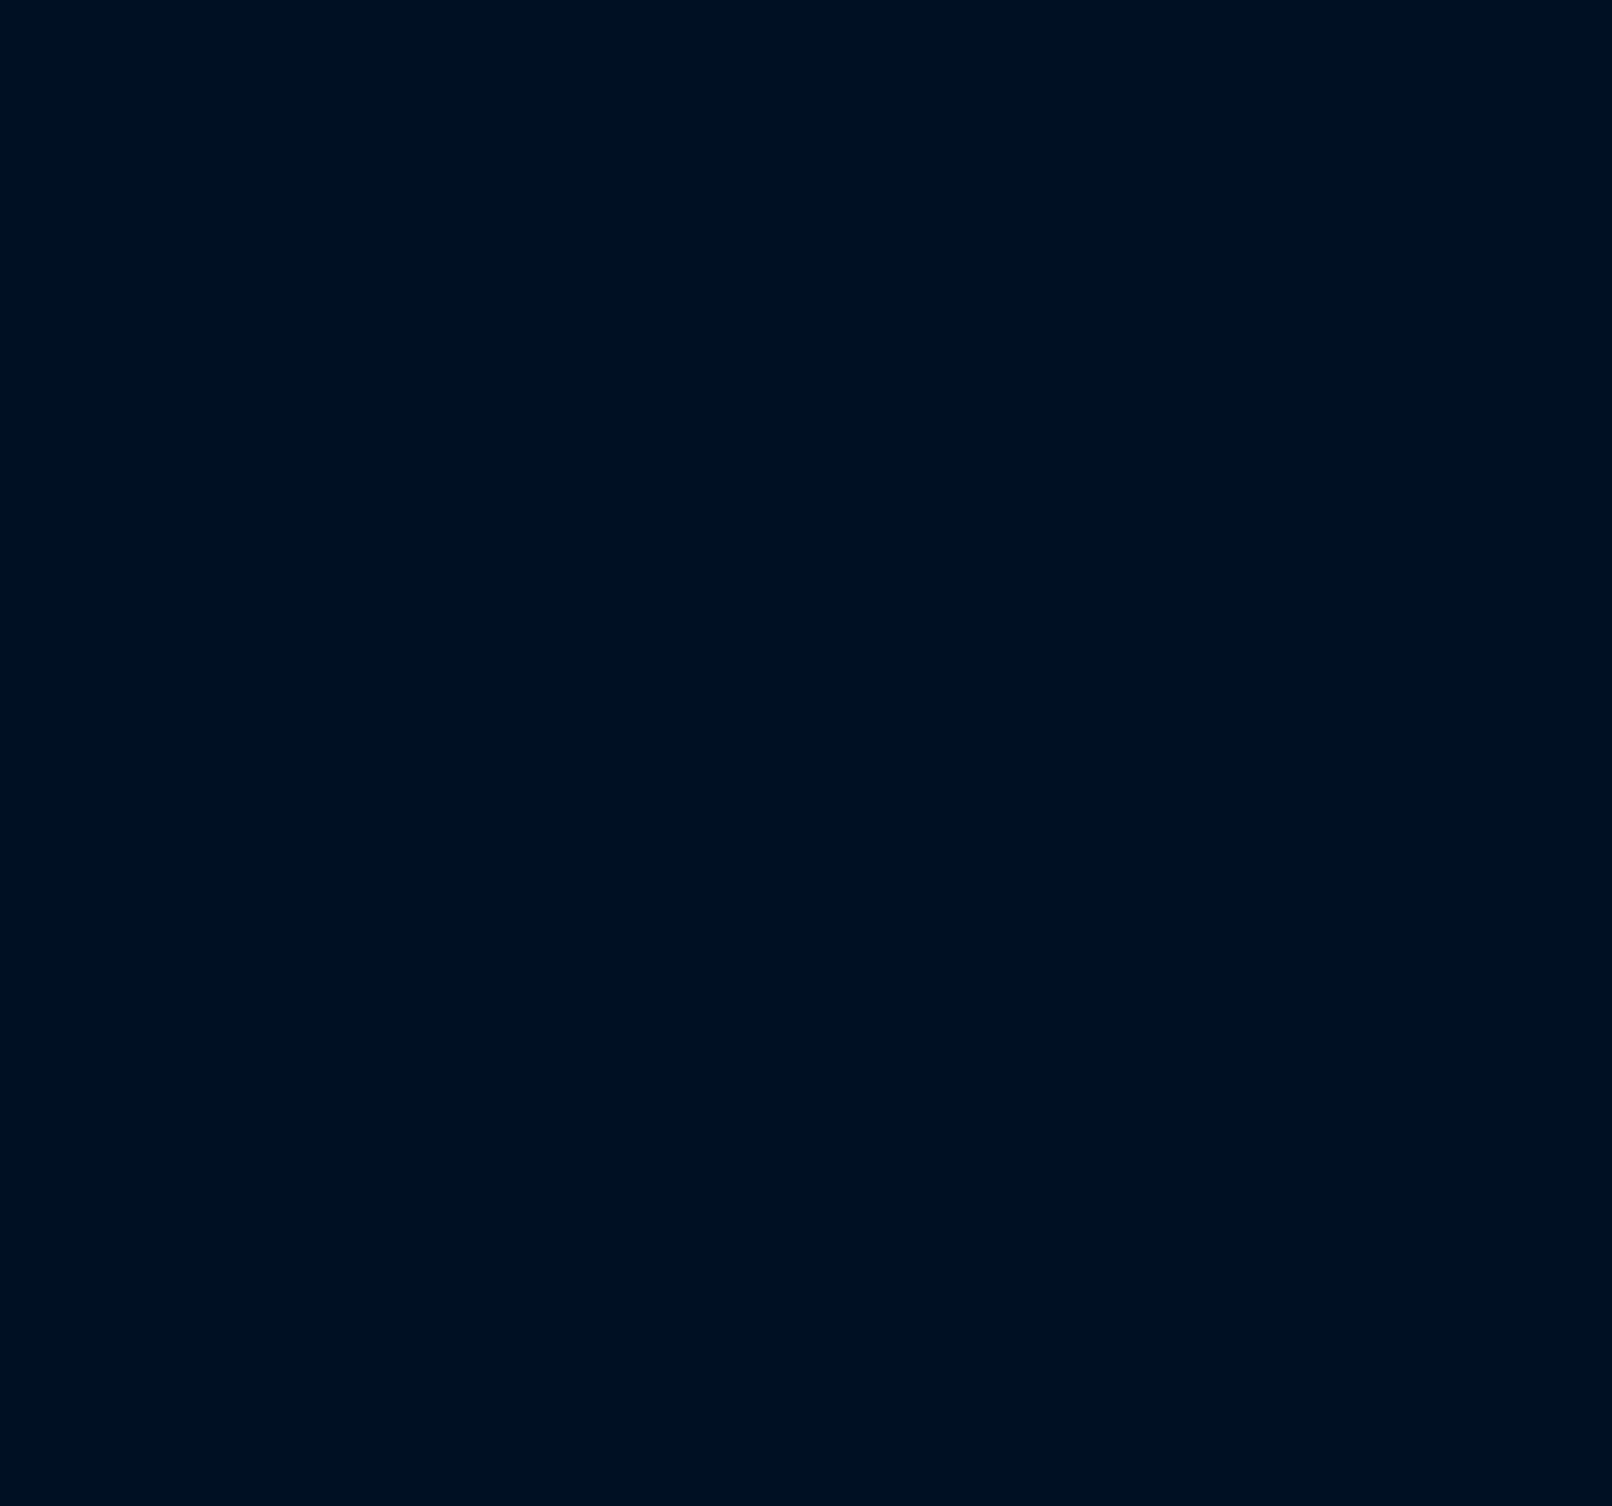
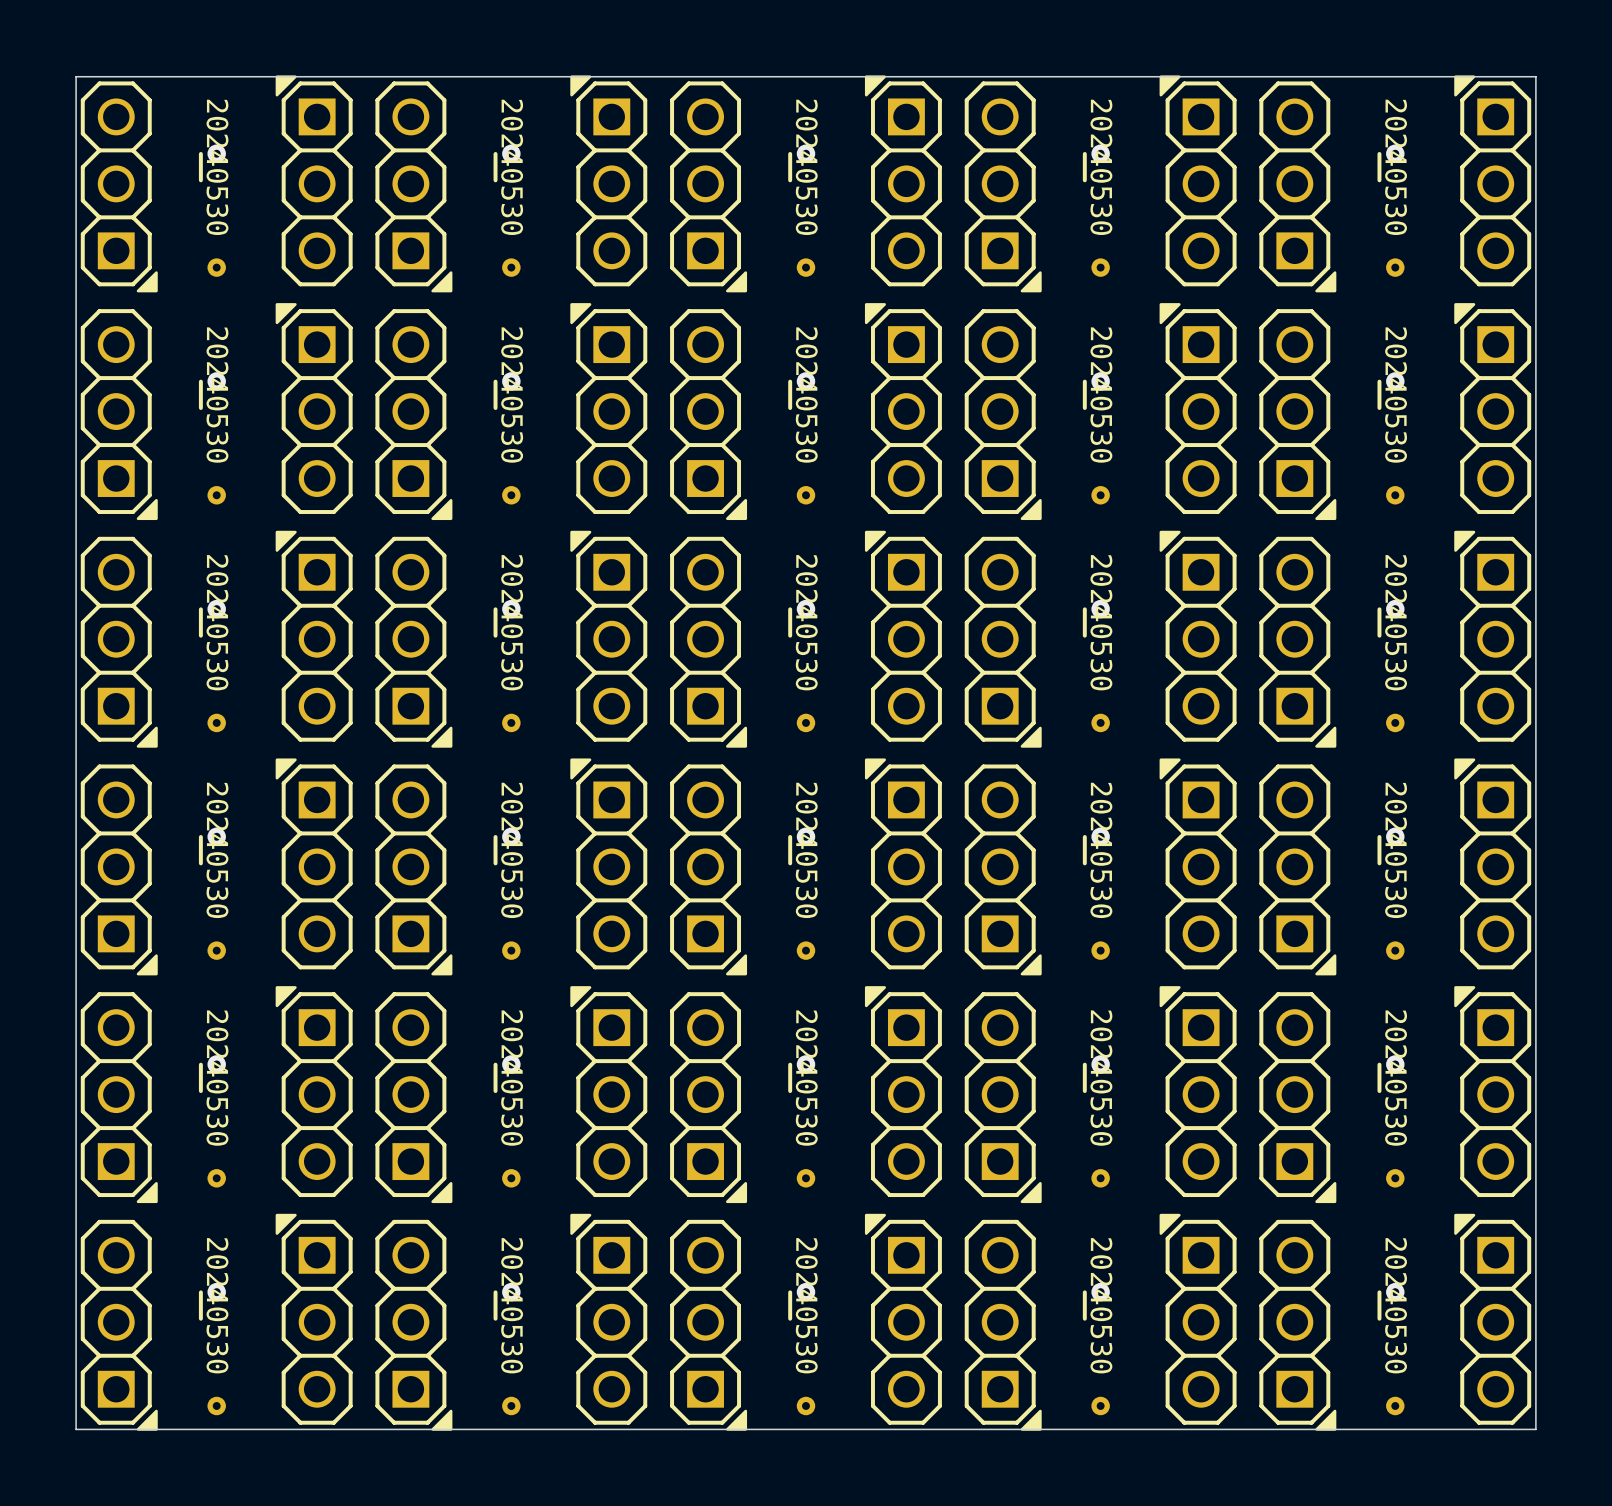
board edge: none -> (1535, 76) (1535, 1429) (76, 1429) (76, 76) (1535, 76)
drawing: none -> [198, 151, 203, 183]
drawing: none -> [493, 151, 498, 183]
drawing: none -> [788, 151, 793, 183]
drawing: none -> [1082, 151, 1087, 183]
drawing: none -> [1377, 151, 1382, 183]
via: none -> (216, 153)
via: none -> (511, 153)
via: none -> (805, 153)
via: none -> (1100, 153)
via: none -> (1395, 153)
part: none -> (314, 180)
part: none -> (608, 180)
part: none -> (903, 180)
part: none -> (1198, 180)
part: none -> (1492, 180)
part: none -> (119, 186)
part: none -> (413, 186)
part: none -> (708, 186)
part: none -> (1003, 186)
part: none -> (1297, 186)
part: none -> (216, 267)
part: none -> (511, 267)
part: none -> (805, 267)
part: none -> (1100, 267)
part: none -> (1395, 267)
drawing: none -> [198, 379, 203, 410]
drawing: none -> [493, 379, 498, 410]
drawing: none -> [788, 379, 793, 410]
drawing: none -> [1082, 379, 1087, 410]
drawing: none -> [1377, 379, 1382, 410]
via: none -> (216, 381)
via: none -> (511, 381)
via: none -> (805, 381)
via: none -> (1100, 381)
via: none -> (1395, 381)
part: none -> (314, 408)
part: none -> (608, 408)
part: none -> (903, 408)
part: none -> (1198, 408)
part: none -> (1492, 408)
part: none -> (119, 414)
part: none -> (413, 414)
part: none -> (708, 414)
part: none -> (1003, 414)
part: none -> (1297, 414)
part: none -> (216, 495)
part: none -> (511, 495)
part: none -> (805, 495)
part: none -> (1100, 495)
part: none -> (1395, 495)
drawing: none -> [198, 607, 203, 638]
drawing: none -> [493, 607, 498, 638]
drawing: none -> [788, 607, 793, 638]
drawing: none -> [1082, 607, 1087, 638]
drawing: none -> [1377, 607, 1382, 638]
via: none -> (216, 609)
via: none -> (511, 609)
via: none -> (805, 609)
via: none -> (1100, 609)
via: none -> (1395, 609)
part: none -> (314, 636)
part: none -> (608, 636)
part: none -> (903, 636)
part: none -> (1198, 636)
part: none -> (1492, 636)
part: none -> (119, 642)
part: none -> (413, 642)
part: none -> (708, 642)
part: none -> (1003, 642)
part: none -> (1297, 642)
part: none -> (216, 722)
part: none -> (511, 722)
part: none -> (805, 722)
part: none -> (1100, 722)
part: none -> (1395, 722)
drawing: none -> [198, 835, 203, 866]
drawing: none -> [493, 835, 498, 866]
drawing: none -> [788, 835, 793, 866]
drawing: none -> [1082, 835, 1087, 866]
drawing: none -> [1377, 835, 1382, 866]
via: none -> (216, 836)
via: none -> (511, 836)
via: none -> (805, 836)
via: none -> (1100, 836)
via: none -> (1395, 836)
part: none -> (314, 863)
part: none -> (608, 863)
part: none -> (903, 863)
part: none -> (1198, 863)
part: none -> (1492, 863)
part: none -> (119, 869)
part: none -> (413, 869)
part: none -> (708, 869)
part: none -> (1003, 869)
part: none -> (1297, 869)
part: none -> (216, 950)
part: none -> (511, 950)
part: none -> (805, 950)
part: none -> (1100, 950)
part: none -> (1395, 950)
drawing: none -> [198, 1062, 203, 1094]
drawing: none -> [493, 1062, 498, 1094]
drawing: none -> [788, 1062, 793, 1094]
drawing: none -> [1082, 1062, 1087, 1094]
drawing: none -> [1377, 1062, 1382, 1094]
via: none -> (216, 1064)
via: none -> (511, 1064)
via: none -> (805, 1064)
via: none -> (1100, 1064)
via: none -> (1395, 1064)
part: none -> (314, 1091)
part: none -> (608, 1091)
part: none -> (903, 1091)
part: none -> (1198, 1091)
part: none -> (1492, 1091)
part: none -> (119, 1097)
part: none -> (413, 1097)
part: none -> (708, 1097)
part: none -> (1003, 1097)
part: none -> (1297, 1097)
part: none -> (216, 1178)
part: none -> (511, 1178)
part: none -> (805, 1178)
part: none -> (1100, 1178)
part: none -> (1395, 1178)
drawing: none -> [198, 1290, 203, 1321]
drawing: none -> [493, 1290, 498, 1321]
drawing: none -> [788, 1290, 793, 1321]
drawing: none -> [1082, 1290, 1087, 1321]
drawing: none -> [1377, 1290, 1382, 1321]
via: none -> (216, 1292)
via: none -> (511, 1292)
via: none -> (805, 1292)
via: none -> (1100, 1292)
via: none -> (1395, 1292)
part: none -> (314, 1319)
part: none -> (608, 1319)
part: none -> (903, 1319)
part: none -> (1198, 1319)
part: none -> (1492, 1319)
part: none -> (119, 1325)
part: none -> (413, 1325)
part: none -> (708, 1325)
part: none -> (1003, 1325)
part: none -> (1297, 1325)
part: none -> (216, 1405)
part: none -> (511, 1405)
part: none -> (805, 1405)
part: none -> (1100, 1405)
part: none -> (1395, 1405)

